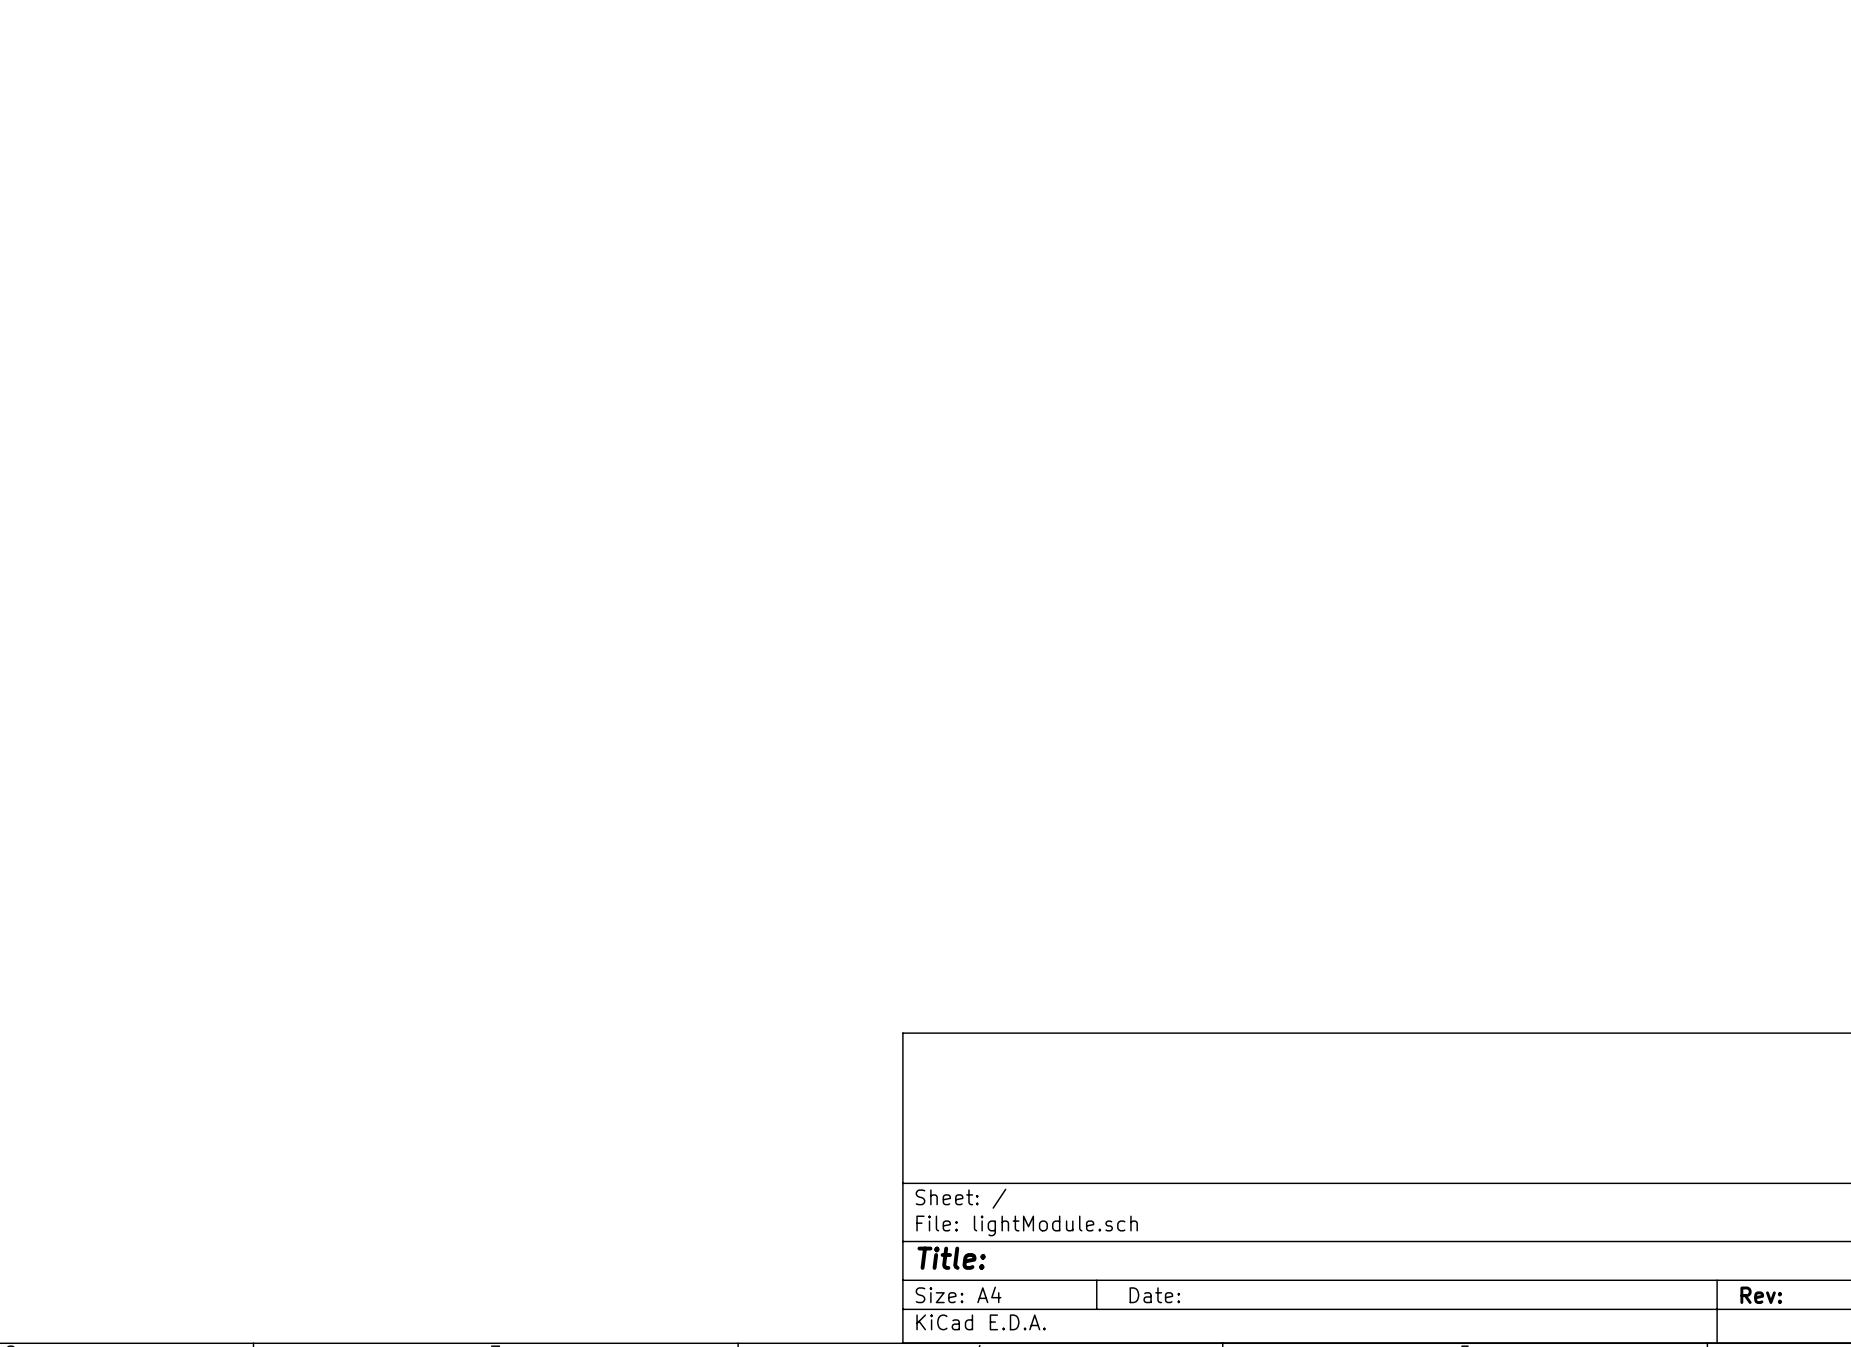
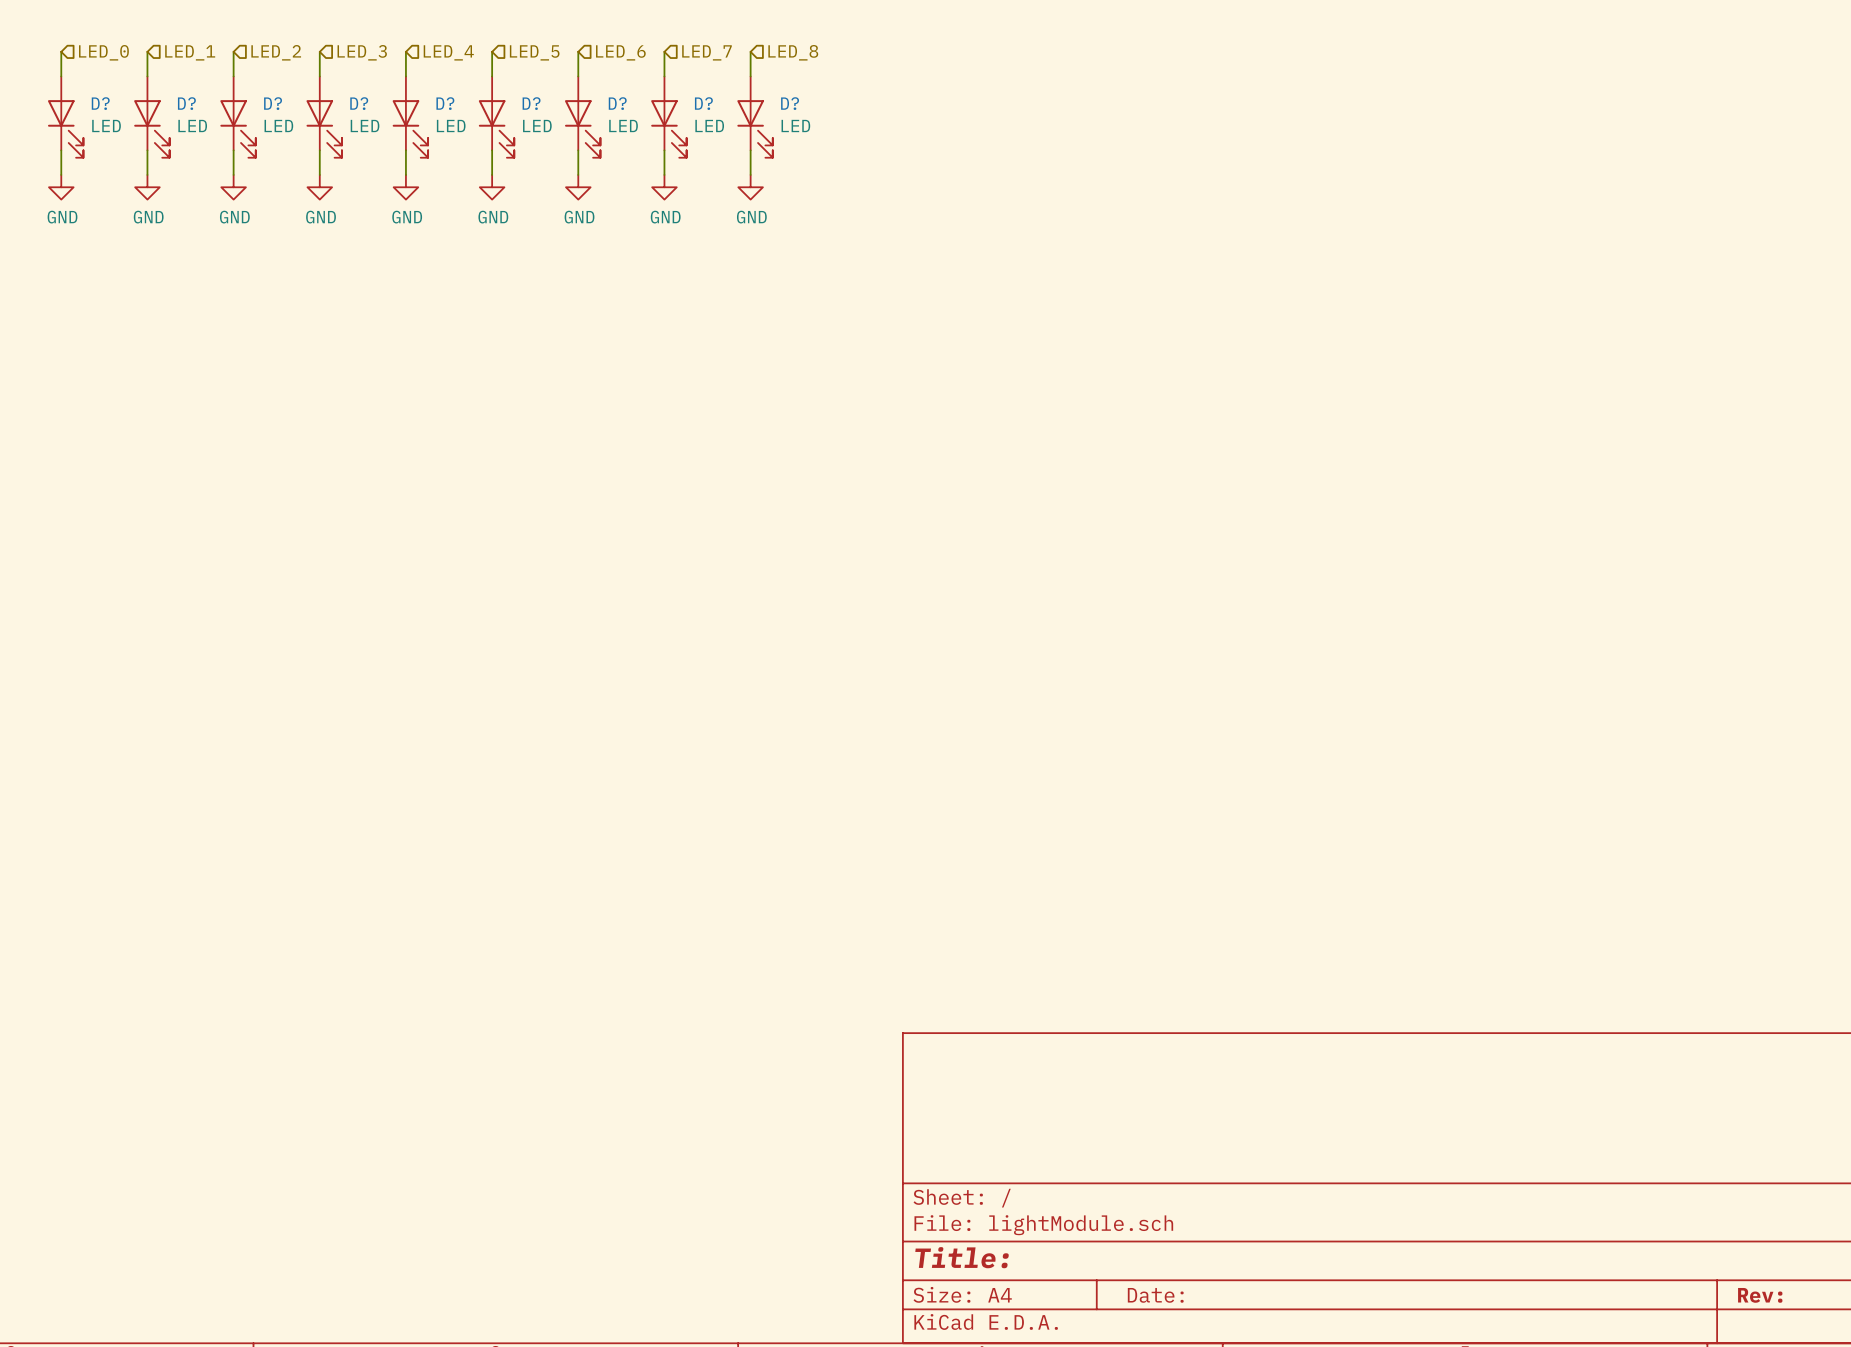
wire: none -> (61, 51) (61, 76)
hierarchical label: none -> LED_0 (103, 52)
wire: none -> (147, 51) (147, 76)
hierarchical label: none -> LED_1 (190, 52)
wire: none -> (233, 51) (233, 76)
hierarchical label: none -> LED_2 (276, 52)
wire: none -> (319, 51) (319, 76)
hierarchical label: none -> LED_3 (362, 52)
wire: none -> (405, 51) (405, 76)
hierarchical label: none -> LED_4 (448, 52)
wire: none -> (492, 51) (492, 76)
hierarchical label: none -> LED_5 (534, 52)
wire: none -> (578, 51) (578, 76)
hierarchical label: none -> LED_6 (620, 52)
wire: none -> (664, 51) (664, 76)
hierarchical label: none -> LED_7 (706, 52)
wire: none -> (750, 51) (750, 76)
hierarchical label: none -> LED_8 (793, 52)
D?: none -> LED (65, 117)
D?: none -> LED (151, 117)
D?: none -> LED (238, 117)
D?: none -> LED (324, 117)
D?: none -> LED (410, 117)
D?: none -> LED (496, 117)
D?: none -> LED (582, 117)
D?: none -> LED (668, 117)
D?: none -> LED (755, 117)
wire: none -> (61, 150) (61, 174)
wire: none -> (147, 150) (147, 174)
wire: none -> (233, 150) (233, 174)
wire: none -> (319, 150) (319, 174)
wire: none -> (405, 150) (405, 174)
wire: none -> (492, 150) (492, 174)
wire: none -> (578, 150) (578, 174)
wire: none -> (664, 150) (664, 174)
wire: none -> (750, 150) (750, 174)
power symbol: none -> GND (61, 187)
power symbol: none -> GND (147, 187)
power symbol: none -> GND (233, 187)
power symbol: none -> GND (319, 187)
power symbol: none -> GND (405, 187)
power symbol: none -> GND (492, 187)
power symbol: none -> GND (578, 187)
power symbol: none -> GND (664, 187)
power symbol: none -> GND (750, 187)

